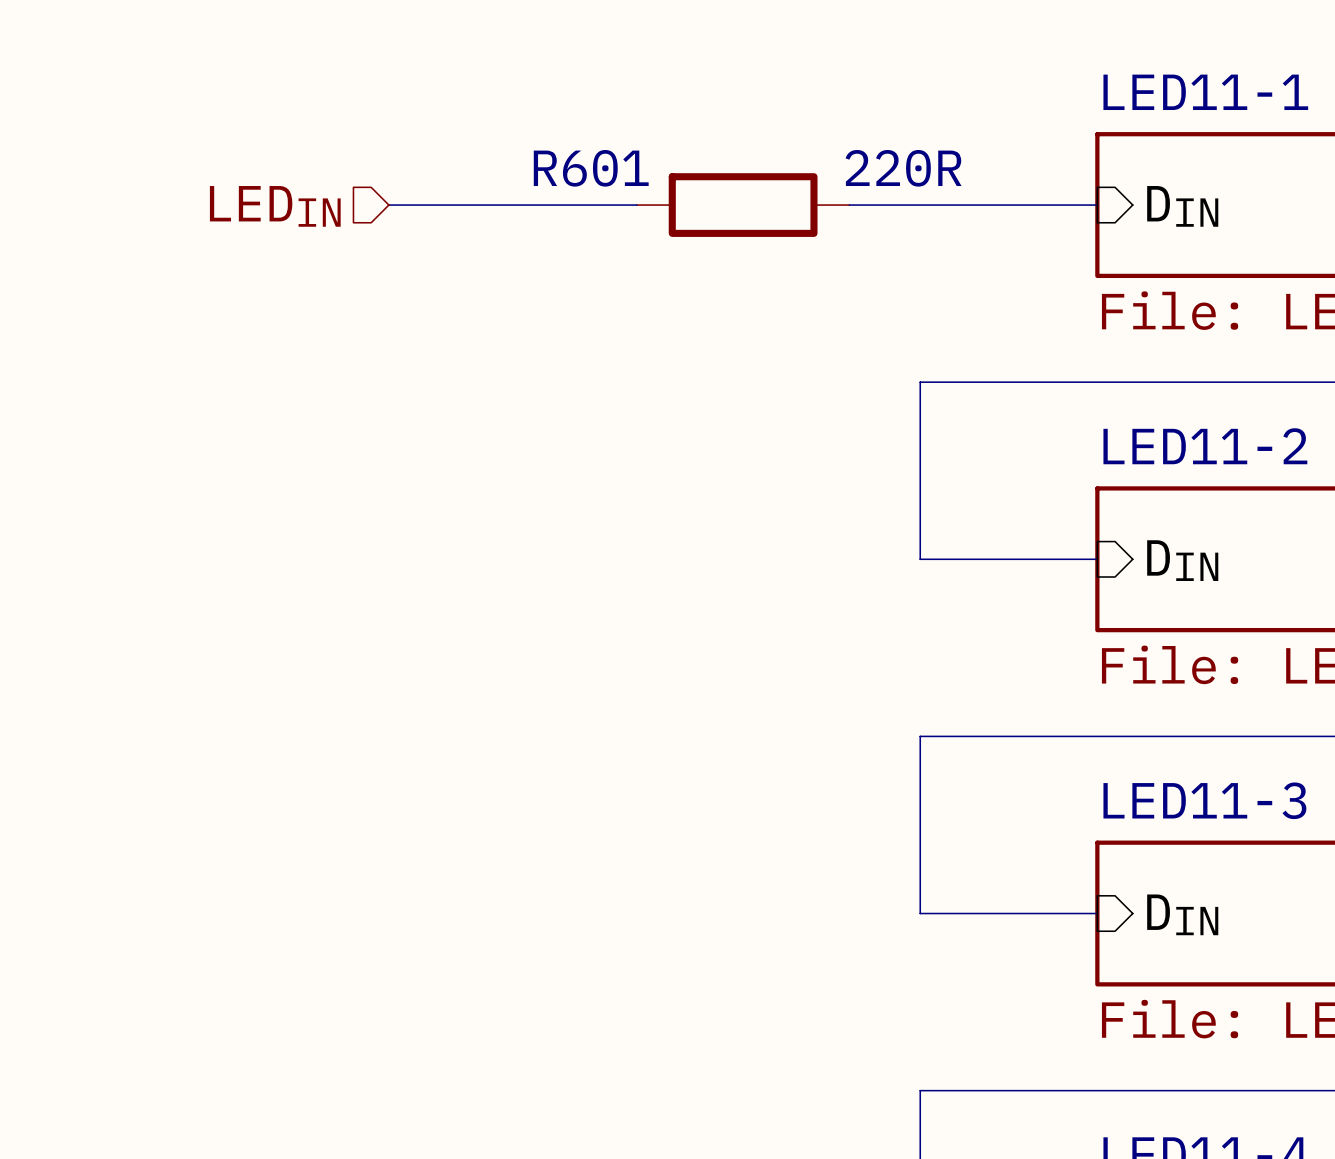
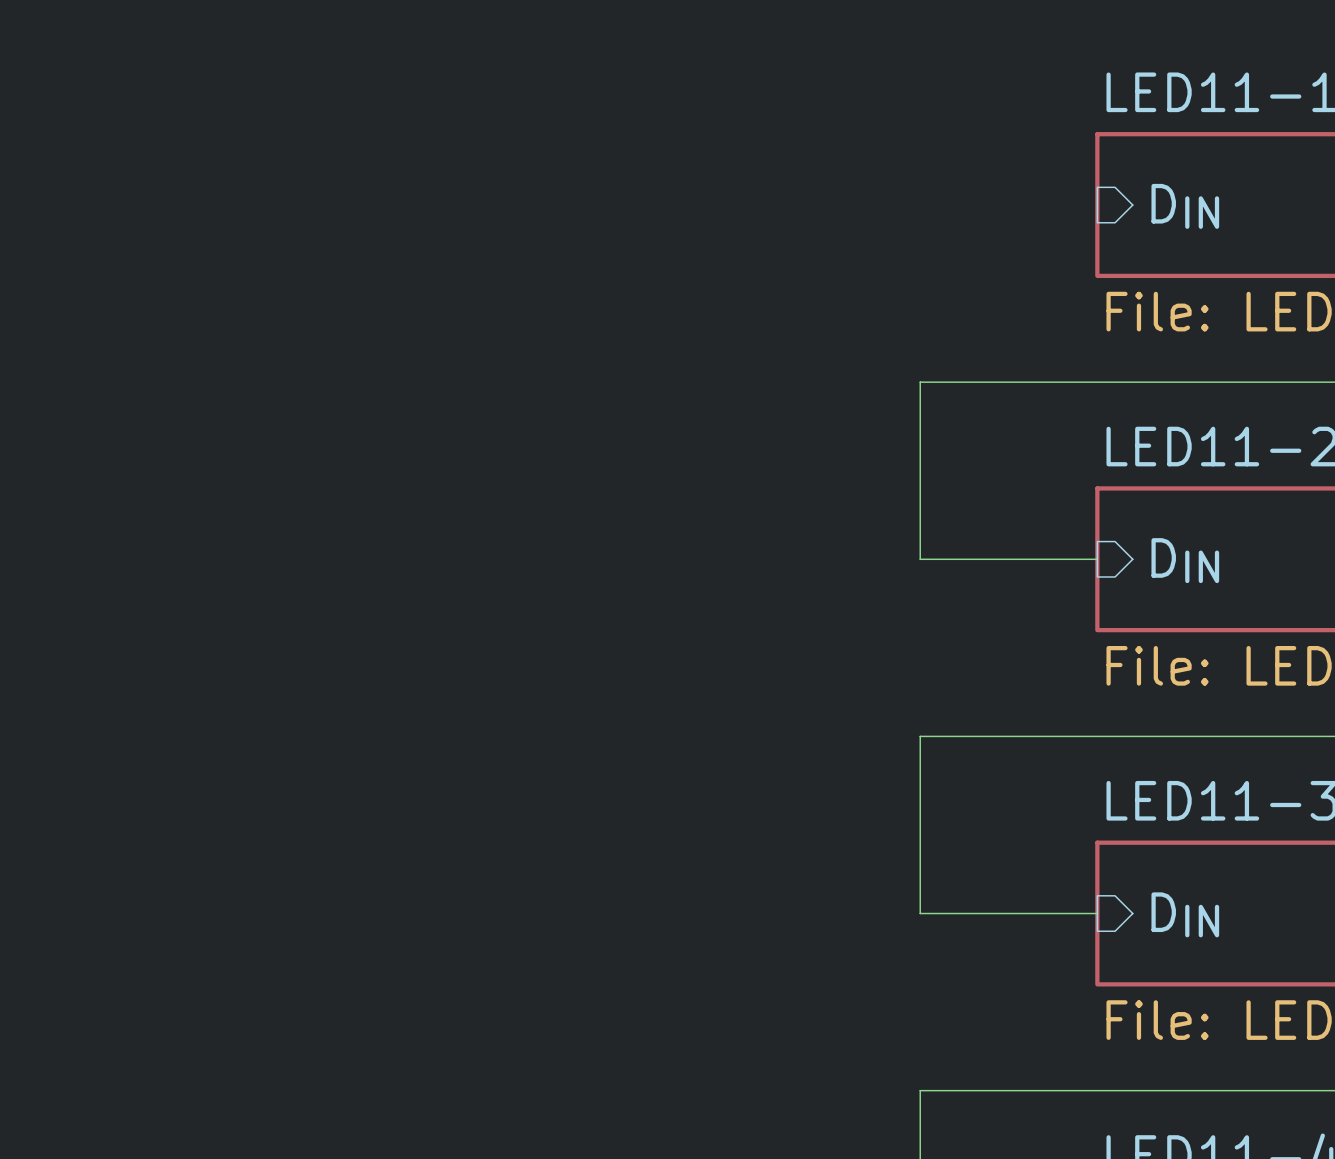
wire: (388, 205) (636, 205) -> none
R601: 220R (743, 205) -> none
wire: (849, 205) (1097, 205) -> none
hierarchical label: LEDIN (275, 206) -> none

